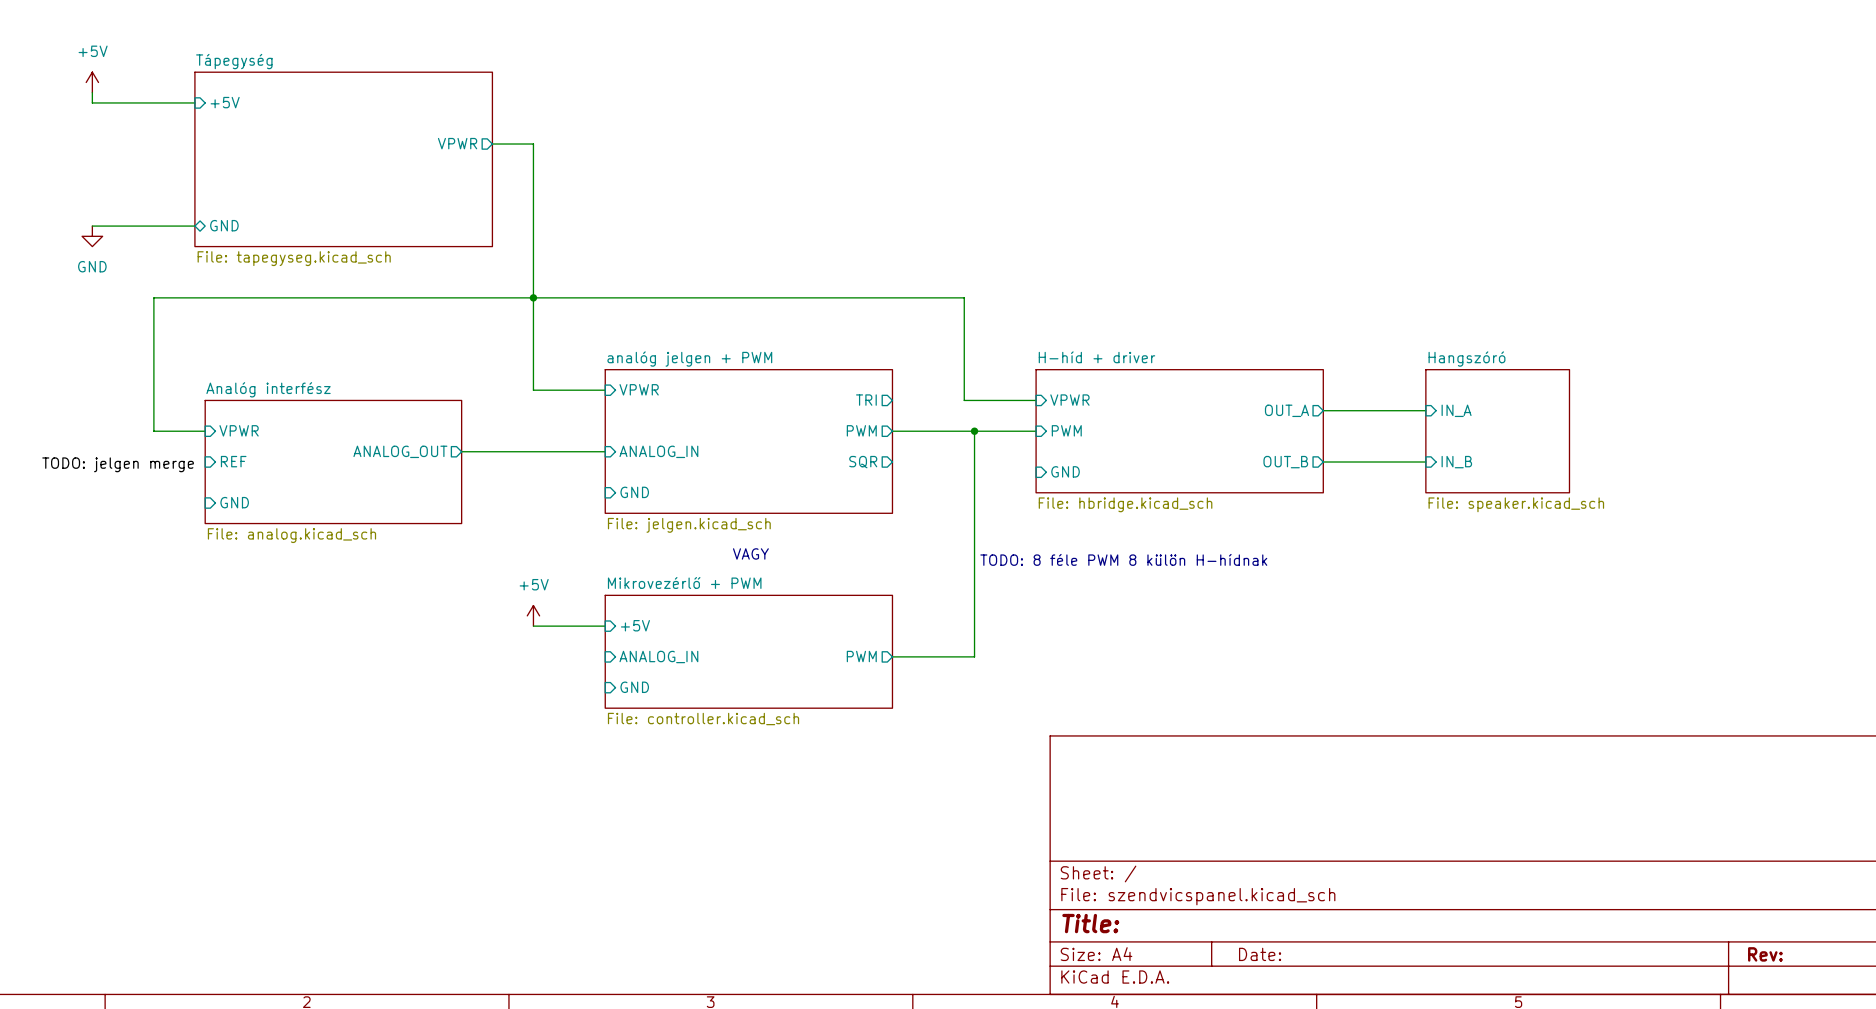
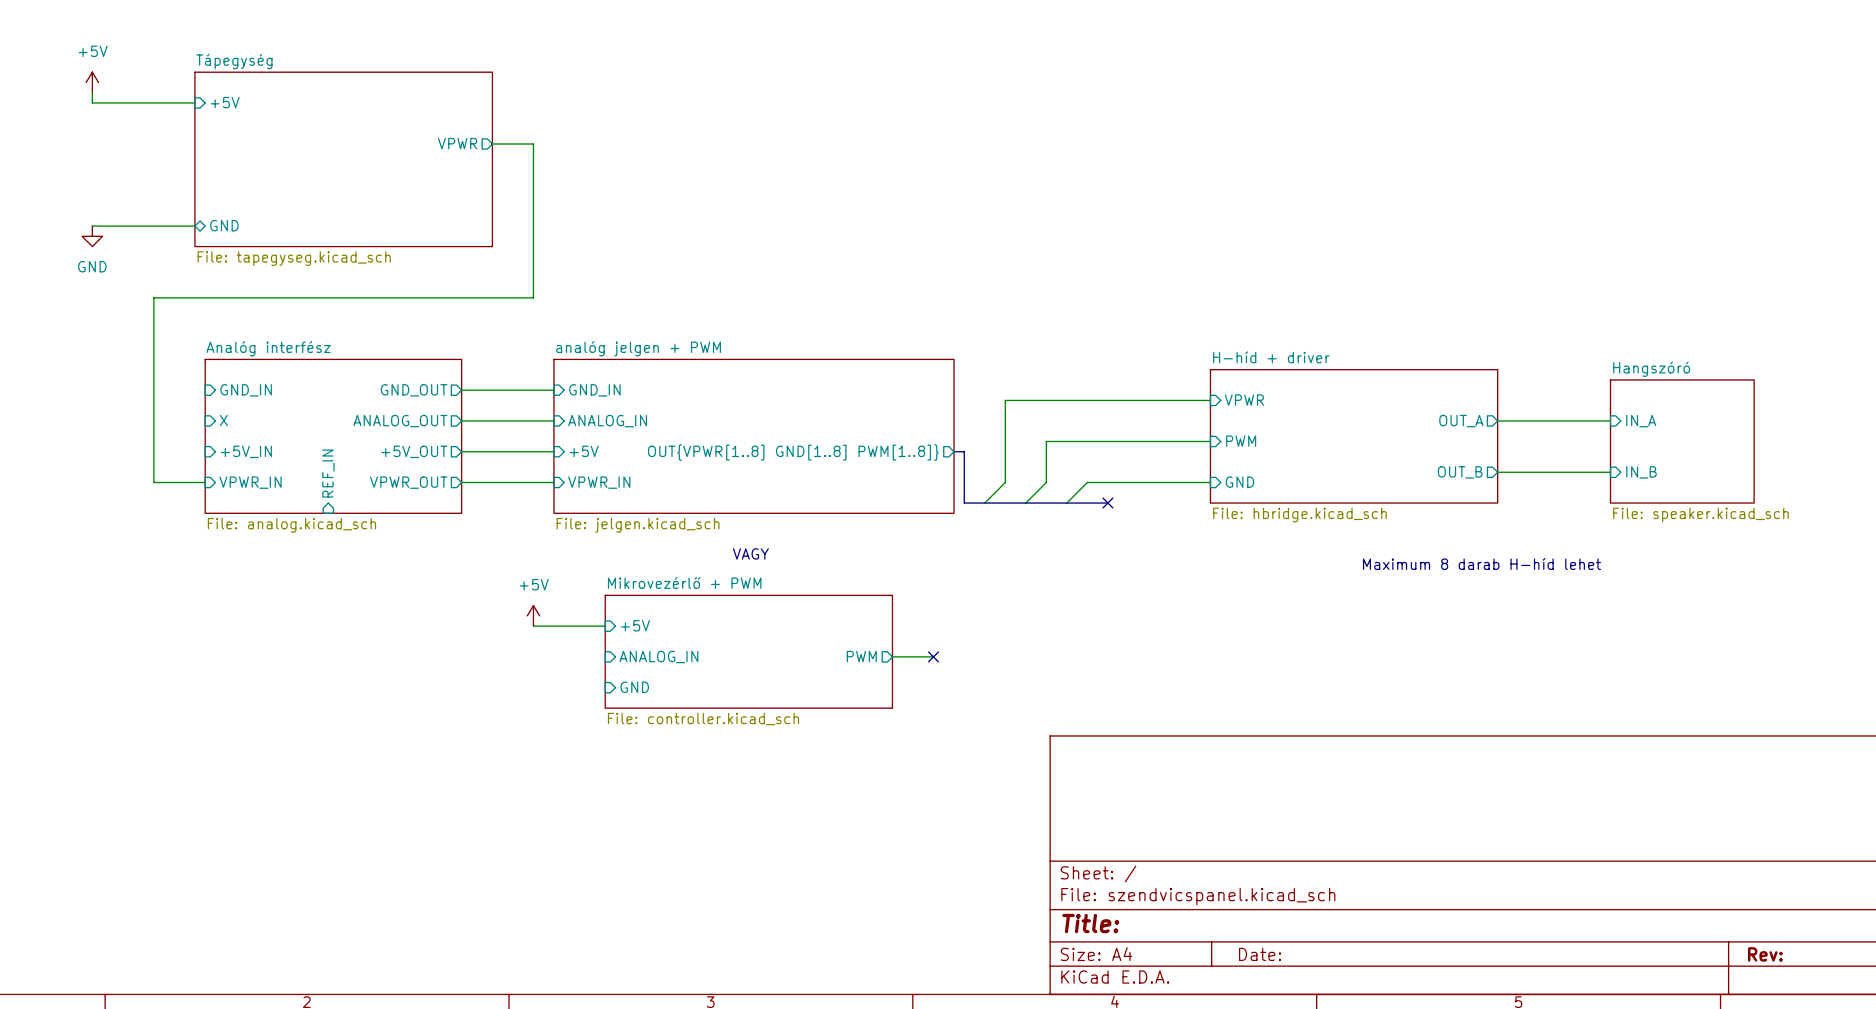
junction: (533, 297) -> none
sheet analóg jelgen + PWM name position: analóg jelgen + PWM (689, 359) -> analóg jelgen + PWM (638, 348)
sheet analóg jelgen + PWM shape: [604, 369, 894, 514] -> [553, 358, 955, 514]
sheet pin: VPWR (639, 389) -> none
sheet pin: none -> GND_IN (246, 390)
sheet pin: none -> GND_OUT (414, 390)
wire: none -> (461, 390) (533, 390)
wire: (533, 390) (533, 297) (964, 297) (964, 400) (1005, 400) -> (984, 503) (1005, 482) (1005, 400)
wire: (553, 390) (605, 390) -> none
sheet pin: none -> GND_IN (594, 390)
sheet pin: TRI (866, 400) -> none
wire: none -> (1036, 400) (1210, 400)
sheet pin position: VPWR (1069, 400) -> VPWR (1244, 400)
sheet pin position: OUT_A (1286, 410) -> OUT_A (1461, 421)
wire: (1323, 410) (1425, 410) -> none
sheet pin position: IN_A (1456, 410) -> IN_A (1641, 421)
sheet pin: none -> X (223, 420)
wire: none -> (461, 420) (553, 420)
wire: none -> (1497, 420) (1610, 420)
sheet pin: none -> ANALOG_OUT (400, 421)
sheet pin: VPWR (239, 430) -> none
sheet pin: PWM (861, 430) -> none
sheet pin: PWM (1066, 430) -> none
wire: (153, 431) (205, 431) -> (153, 431) (153, 482) (205, 482)
wire: (892, 431) (1036, 431) -> none
wire: (974, 431) (974, 656) (933, 656) -> none
junction: (974, 431) -> none
sheet H-híd + driver: File: hbridge.kicad_sch (1179, 431) -> none
sheet Hangszóró position: (1497, 431) -> (1682, 441)
sheet Analóg interfész: none -> File: analog.kicad_sch (333, 436)
sheet H-híd + driver: none -> File: hbridge.kicad_sch (1354, 436)
wire: none -> (1210, 441) (1046, 441) (1046, 482) (1025, 503)
sheet pin: none -> PWM (1241, 441)
sheet pin: none -> +5V_IN (246, 451)
sheet pin: ANALOG_OUT (400, 451) -> +5V_OUT (414, 451)
wire: (553, 451) (605, 451) -> none
sheet pin: none -> +5V (584, 451)
sheet pin position: ANALOG_IN (658, 451) -> ANALOG_IN (607, 421)
bus: none -> (954, 451) (964, 451) (964, 503) (1107, 503)
sheet pin: none -> OUT{VPWR[1..8] GND[1..8] PWM[1..8]} (793, 452)
sheet pin: REF (233, 461) -> none
sheet Analóg interfész: File: analog.kicad_sch (333, 462) -> none
sheet pin: SQR (863, 462) -> none
sheet pin position: OUT_B (1285, 462) -> OUT_B (1460, 472)
wire: (1323, 462) (1425, 462) -> none
sheet pin position: IN_B (1456, 462) -> IN_B (1641, 472)
label: TODO: jelgen merge (118, 464) -> none
sheet pin position: GND (1065, 471) -> GND (1239, 482)
wire: none -> (1497, 472) (1610, 472)
sheet pin: none -> REF_IN (328, 473)
sheet pin: none -> VPWR_IN (250, 482)
sheet pin: none -> VPWR_OUT (408, 482)
wire: none -> (461, 482) (553, 482)
sheet pin: none -> VPWR_IN (599, 482)
wire: none -> (1210, 482) (1087, 482) (1066, 503)
sheet pin: GND (634, 492) -> none
sheet pin: GND (234, 502) -> none
no-connect mark: none -> (1107, 503)
sheet analóg jelgen + PWM value position: File: jelgen.kicad_sch (689, 525) -> File: jelgen.kicad_sch (638, 525)
text: TODO: 8 féle PWM 8 külön H-hídnak (1123, 559) -> none
text: none -> Maximum 8 darab H-híd lehet (1482, 563)
no-connect mark: none -> (933, 656)

